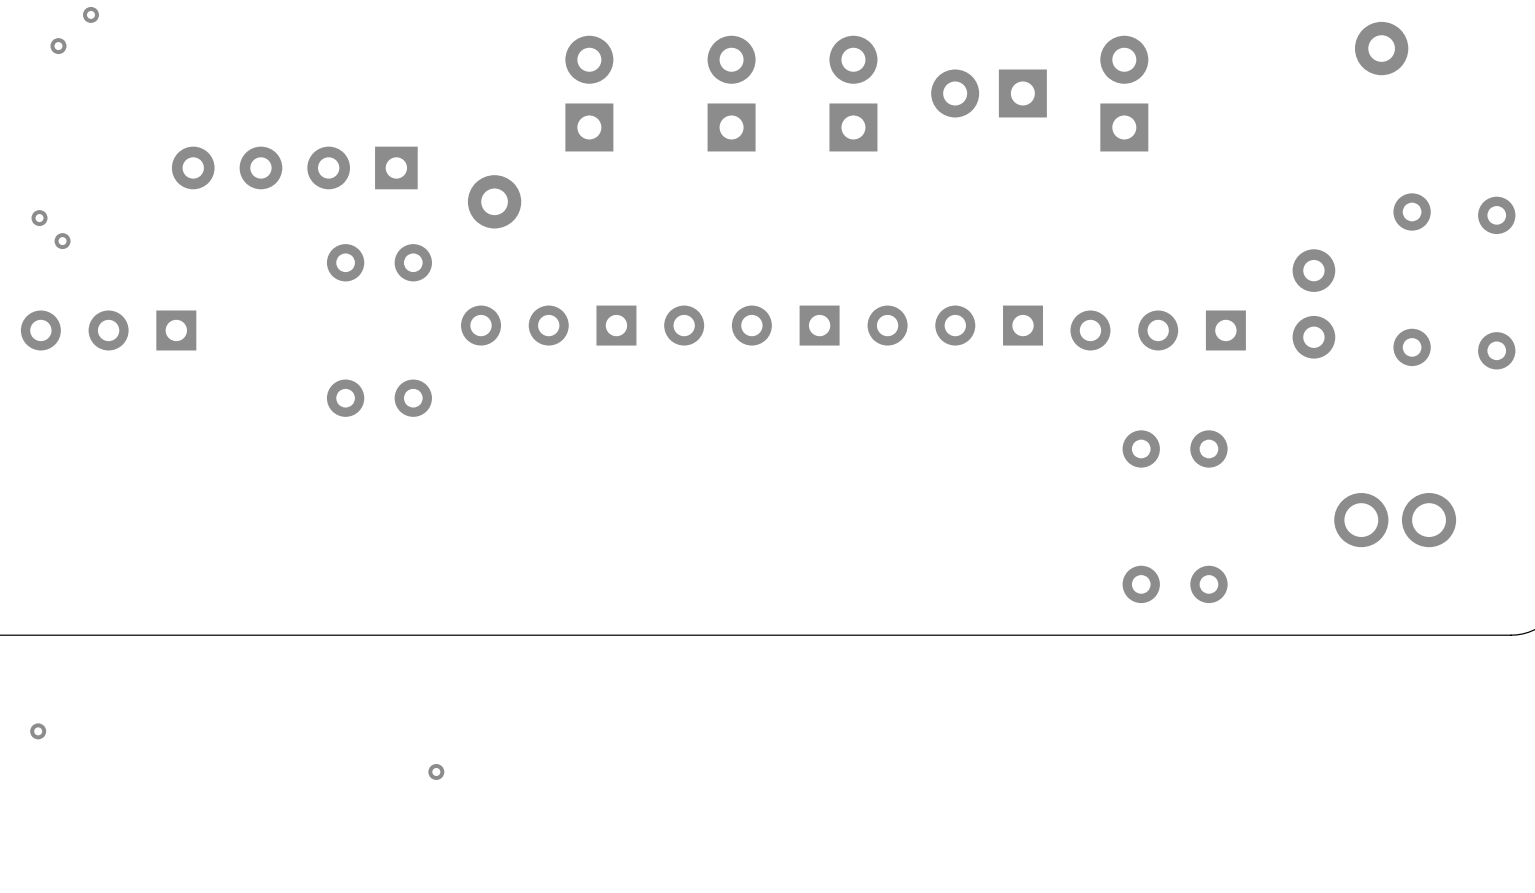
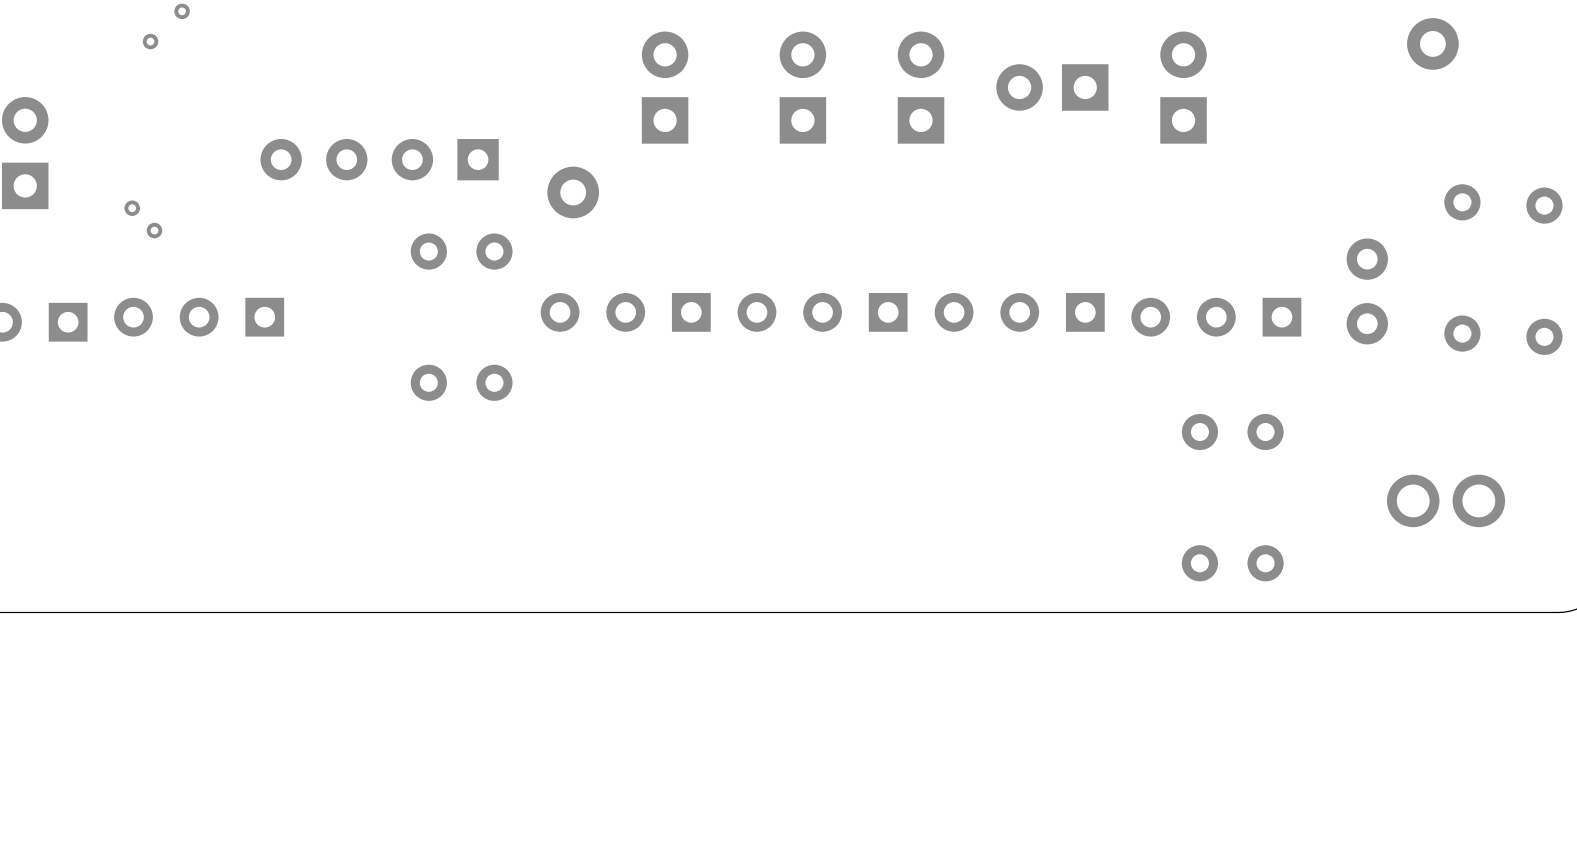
part: (38, 731) -> none
part: (436, 771) -> none

